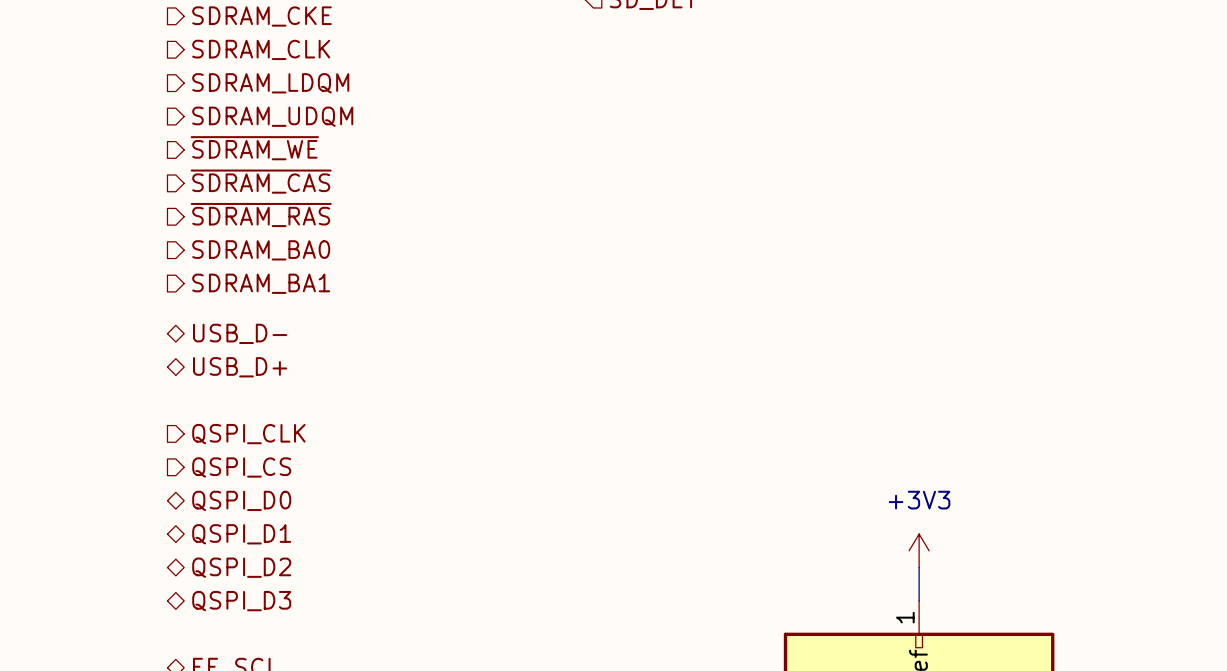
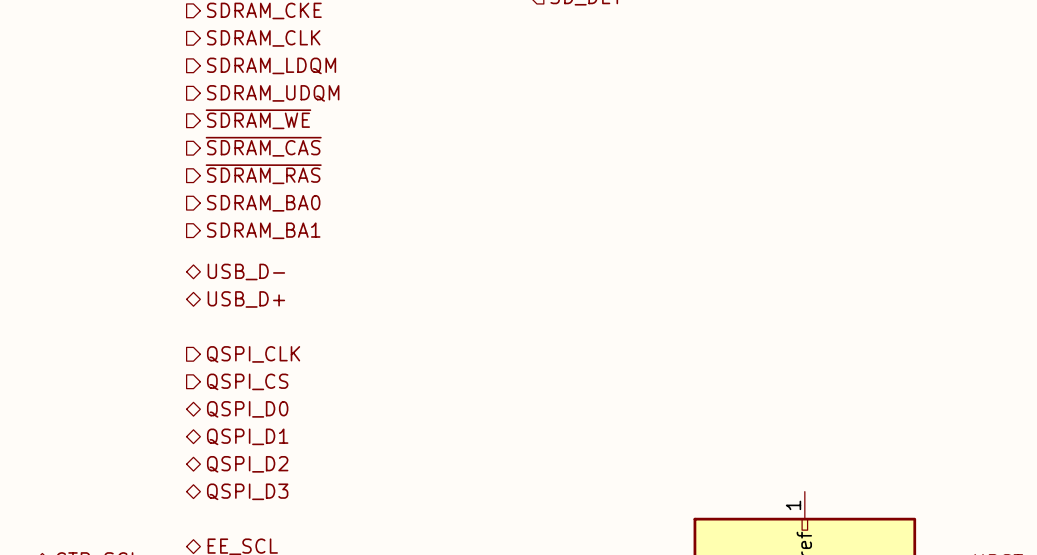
power symbol: +3V3 (919, 550) -> none
wire: (919, 567) (919, 600) -> none

